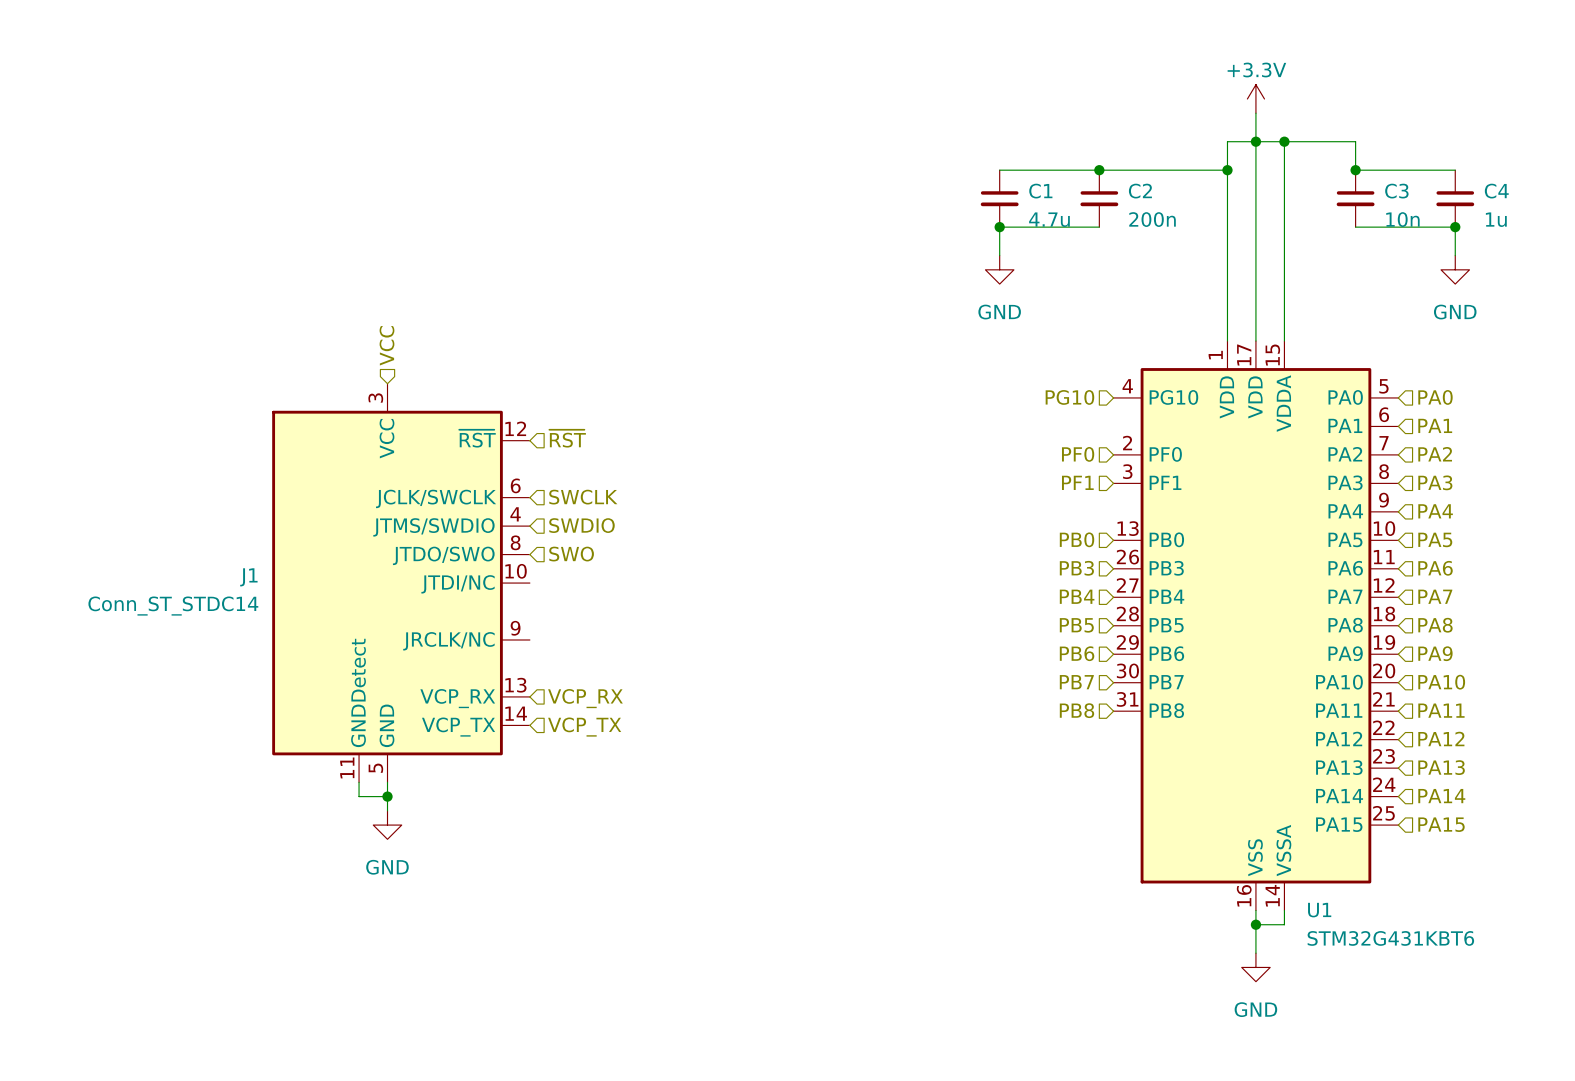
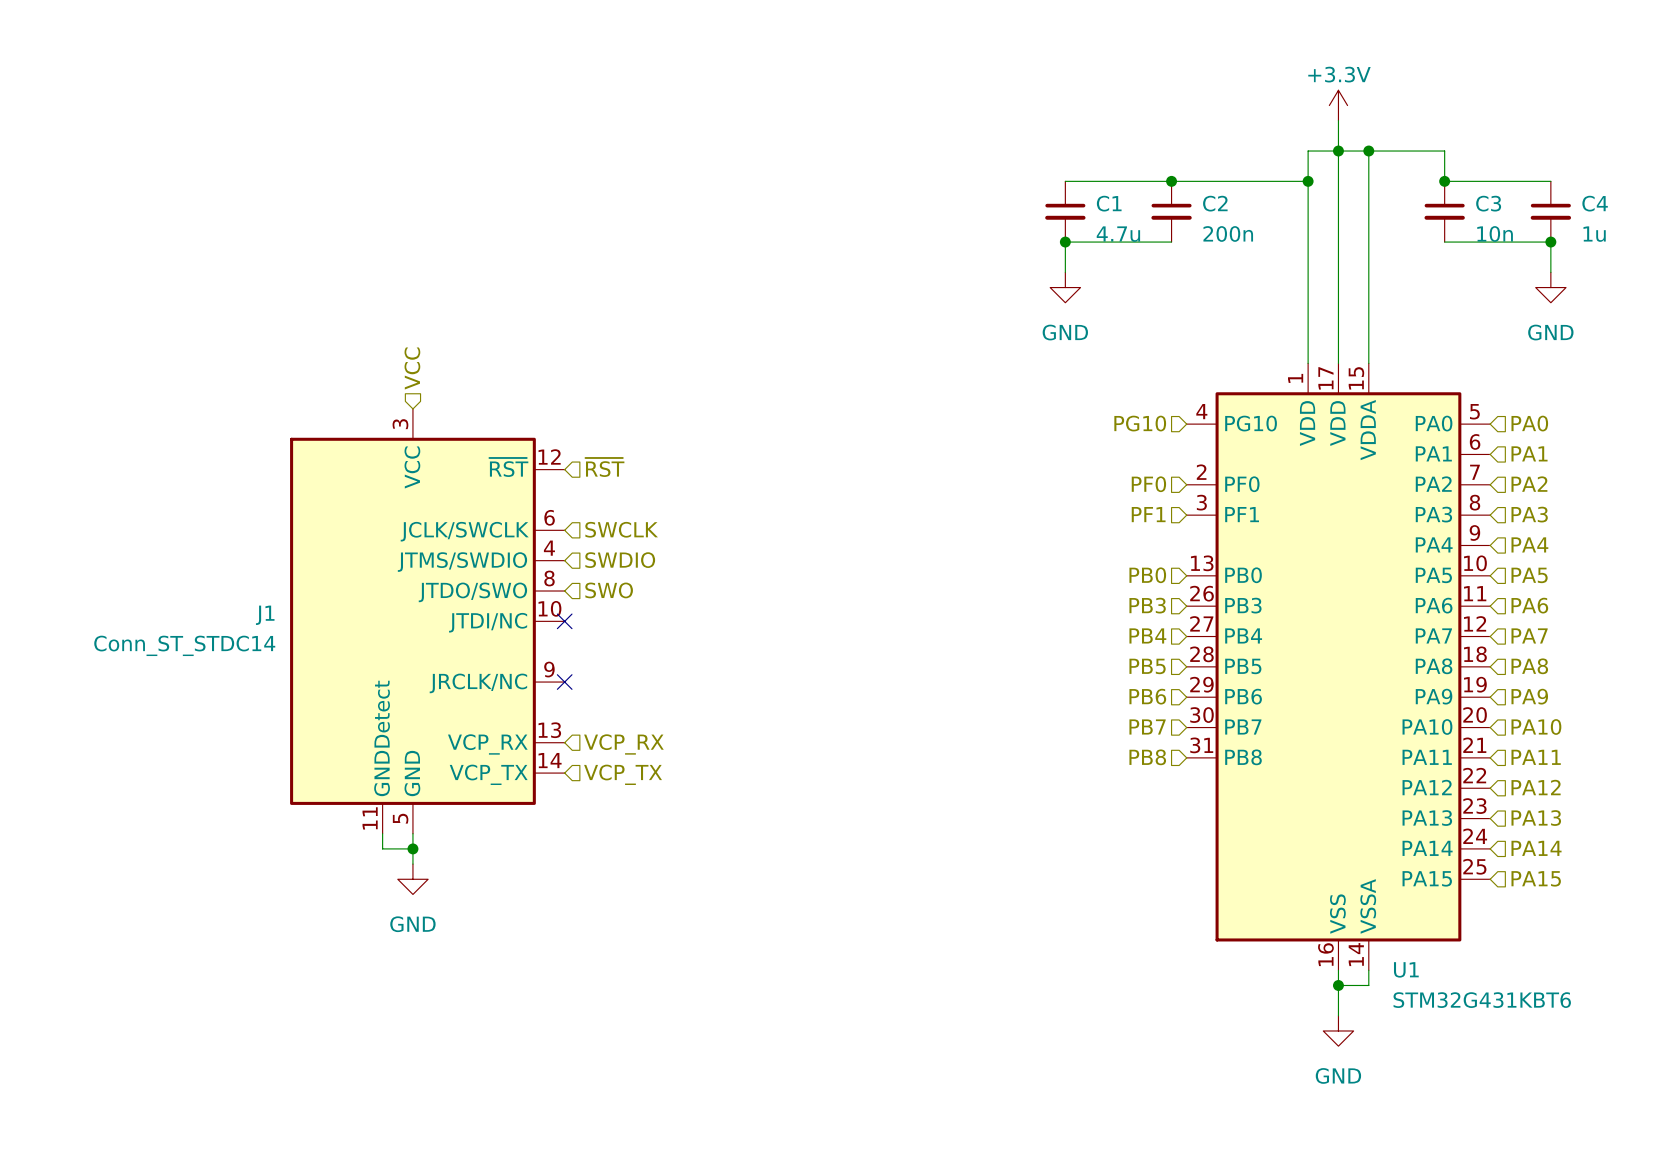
no-connect mark: none -> (564, 621)
no-connect mark: none -> (564, 682)

